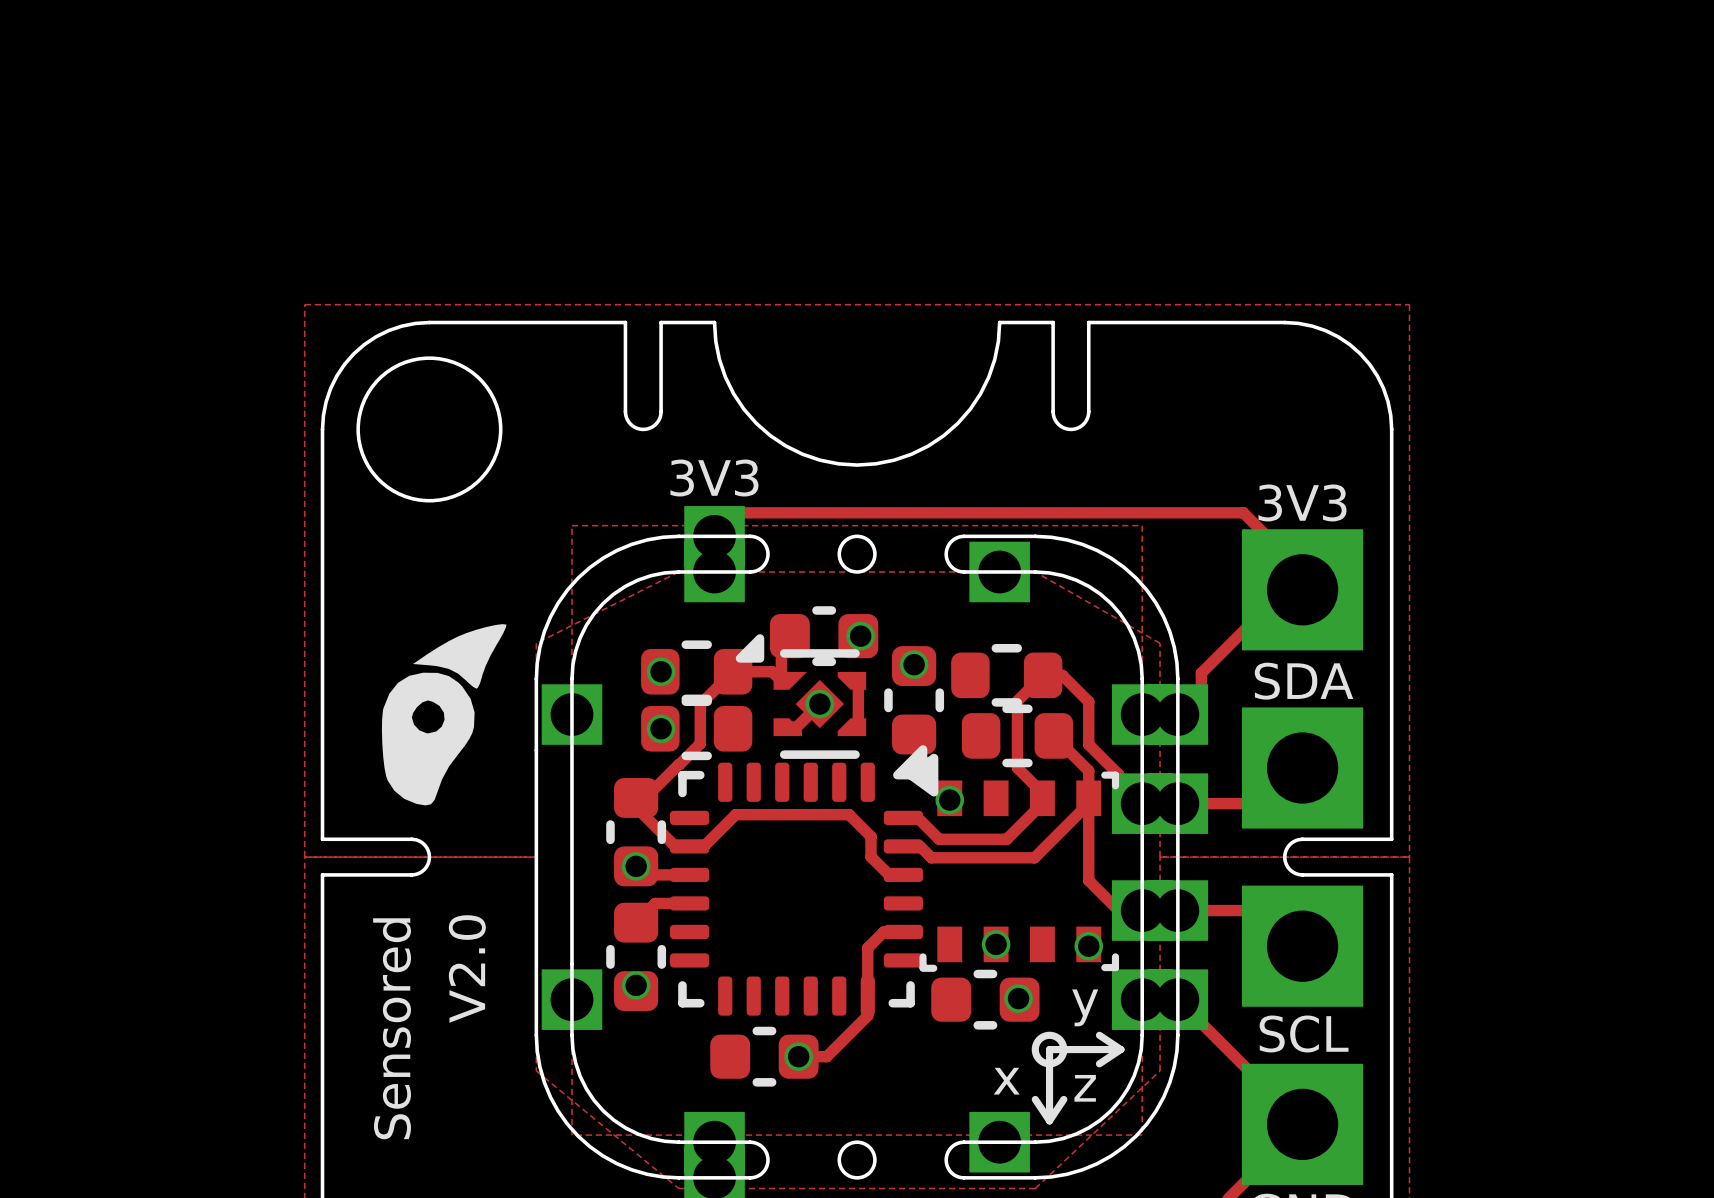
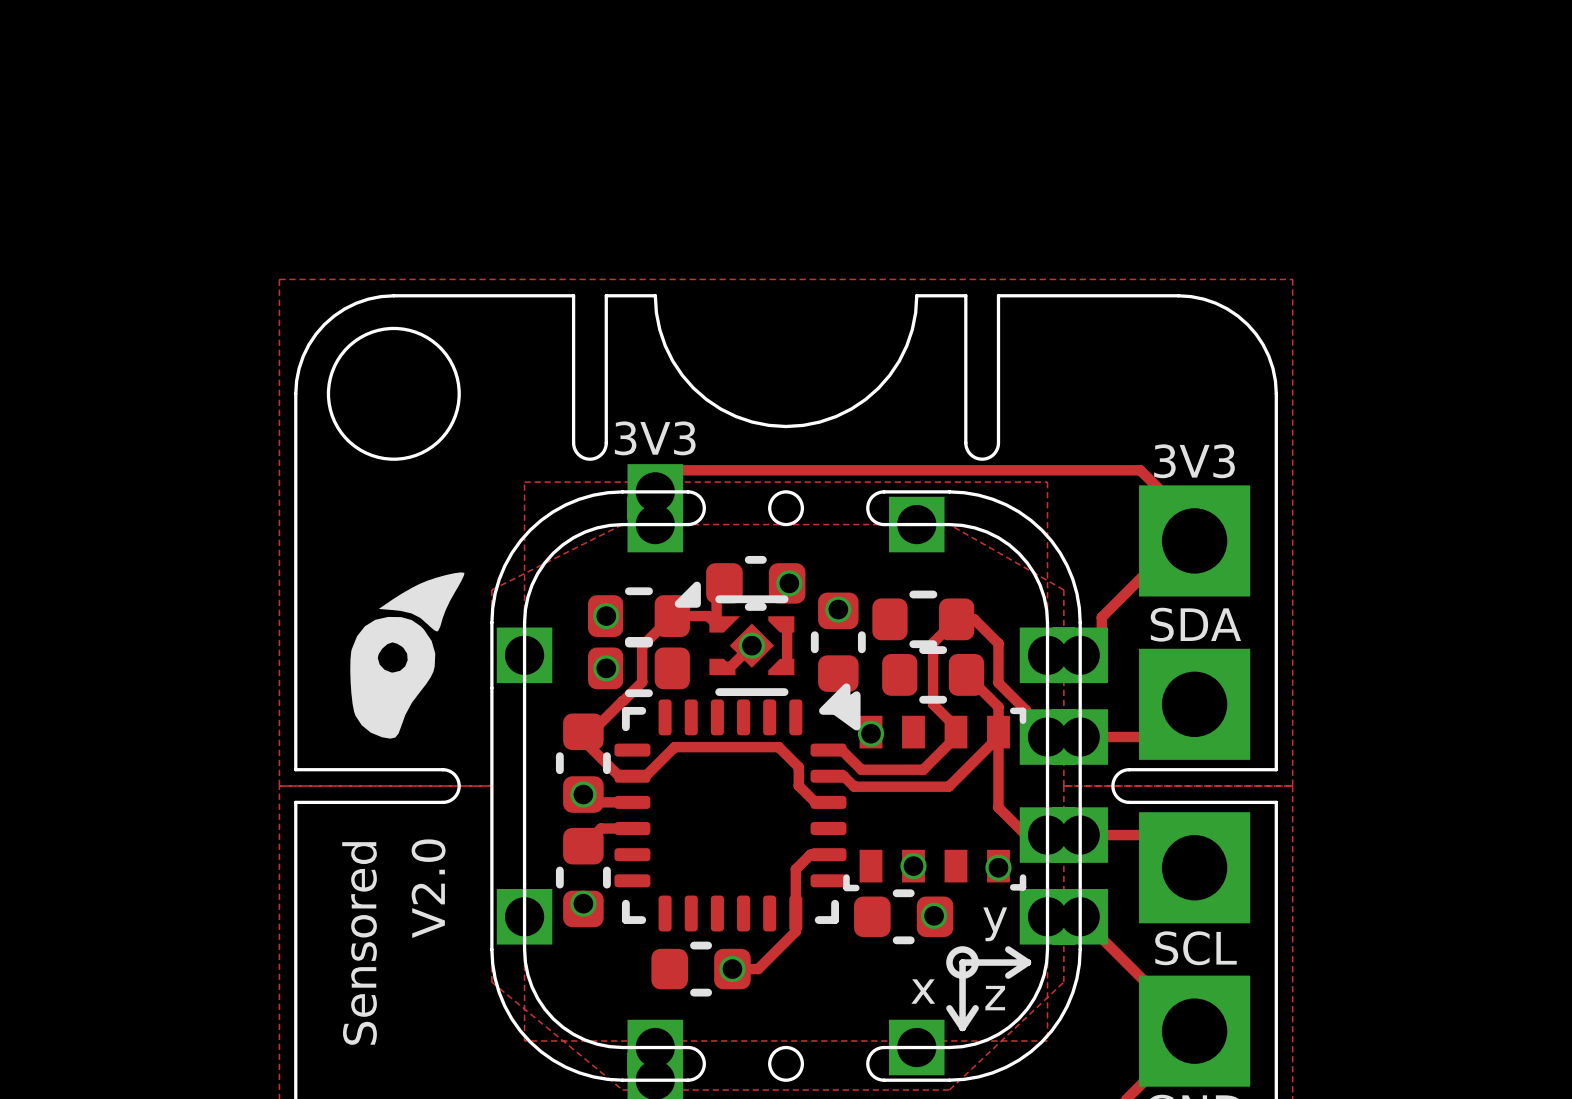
board edge: (625, 411) (630, 424) (643, 429) (655, 424) (661, 411) -> (573, 377) (574, 447) (579, 455) (589, 459) (599, 455) (605, 447) (606, 377)
board edge: (1053, 411) (1058, 424) (1070, 429) (1083, 424) (1088, 411) -> (965, 377) (966, 447) (972, 455) (982, 459) (992, 455) (997, 447) (998, 377)
board edge: (411, 839) (424, 844) (429, 857) (424, 869) (411, 874) -> (377, 769) (447, 770) (455, 776) (459, 786) (455, 795) (447, 801) (377, 802)
board edge: (1302, 839) (1289, 844) (1284, 857) (1289, 869) (1302, 874) -> (1194, 769) (1125, 770) (1116, 776) (1112, 786) (1116, 795) (1125, 801) (1194, 802)

